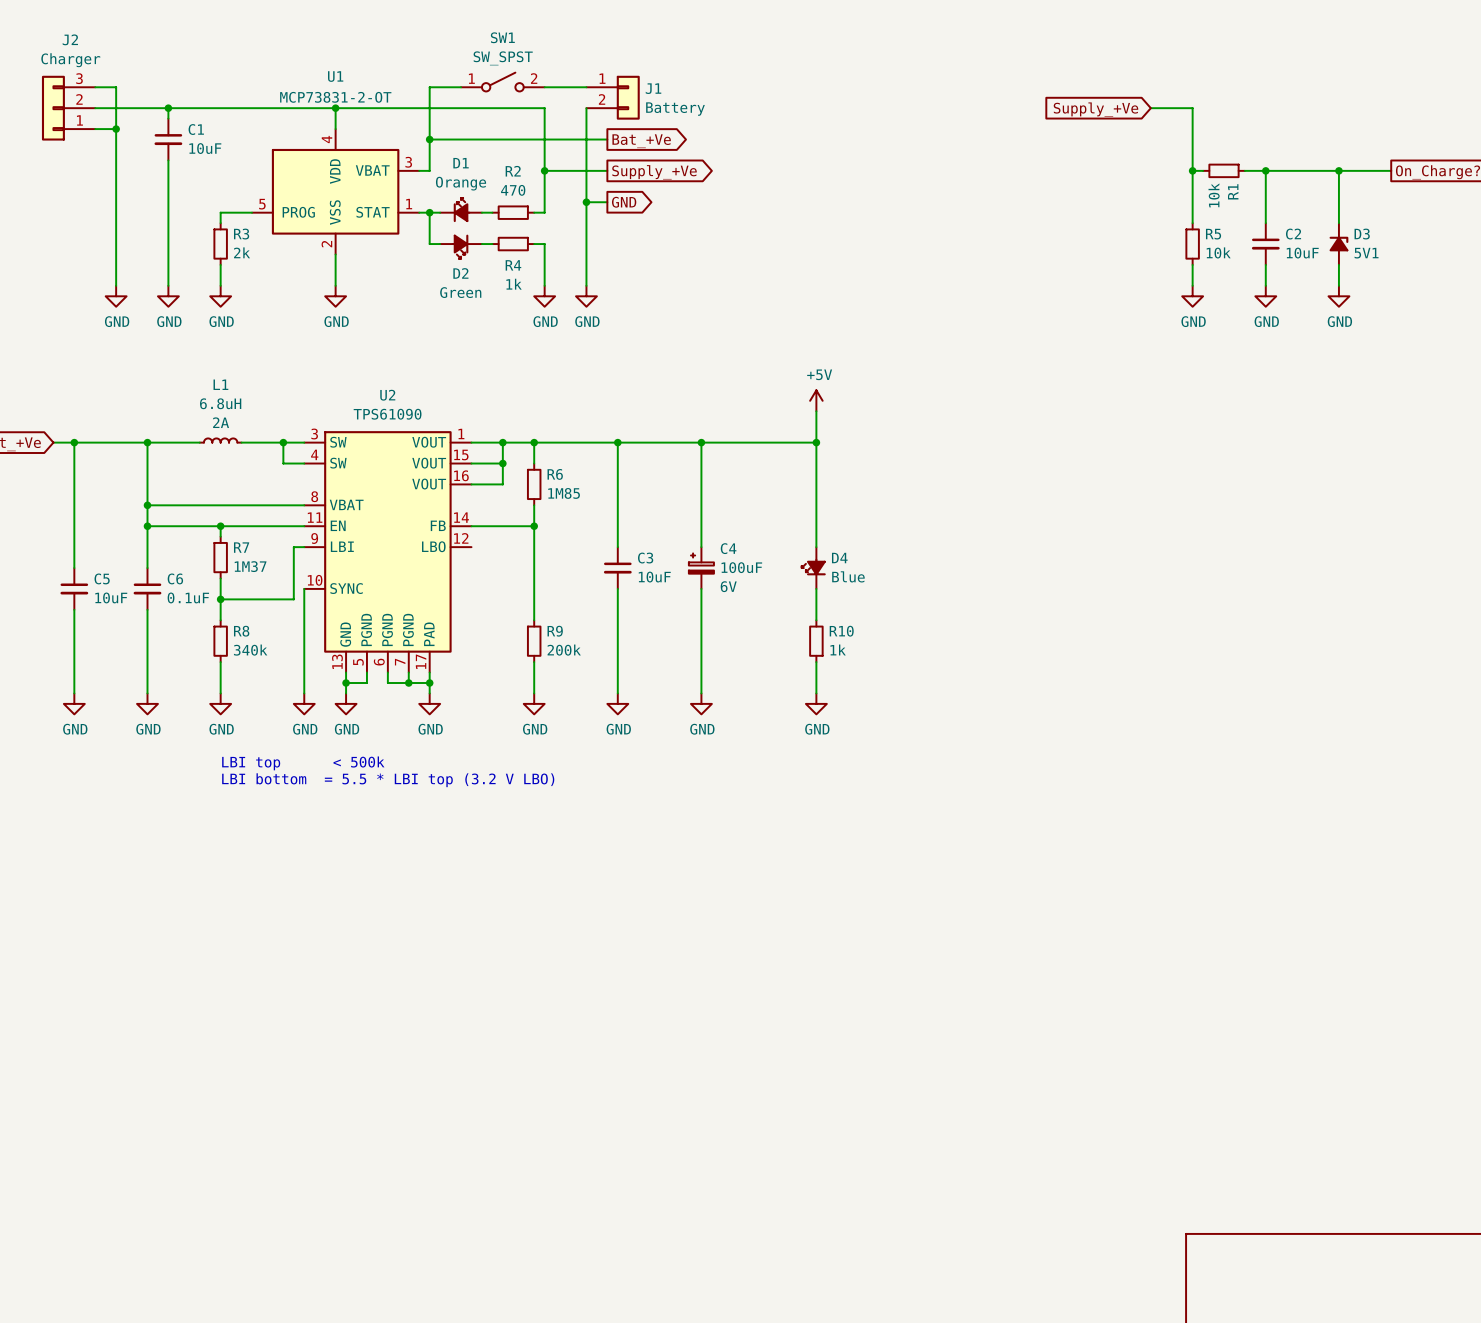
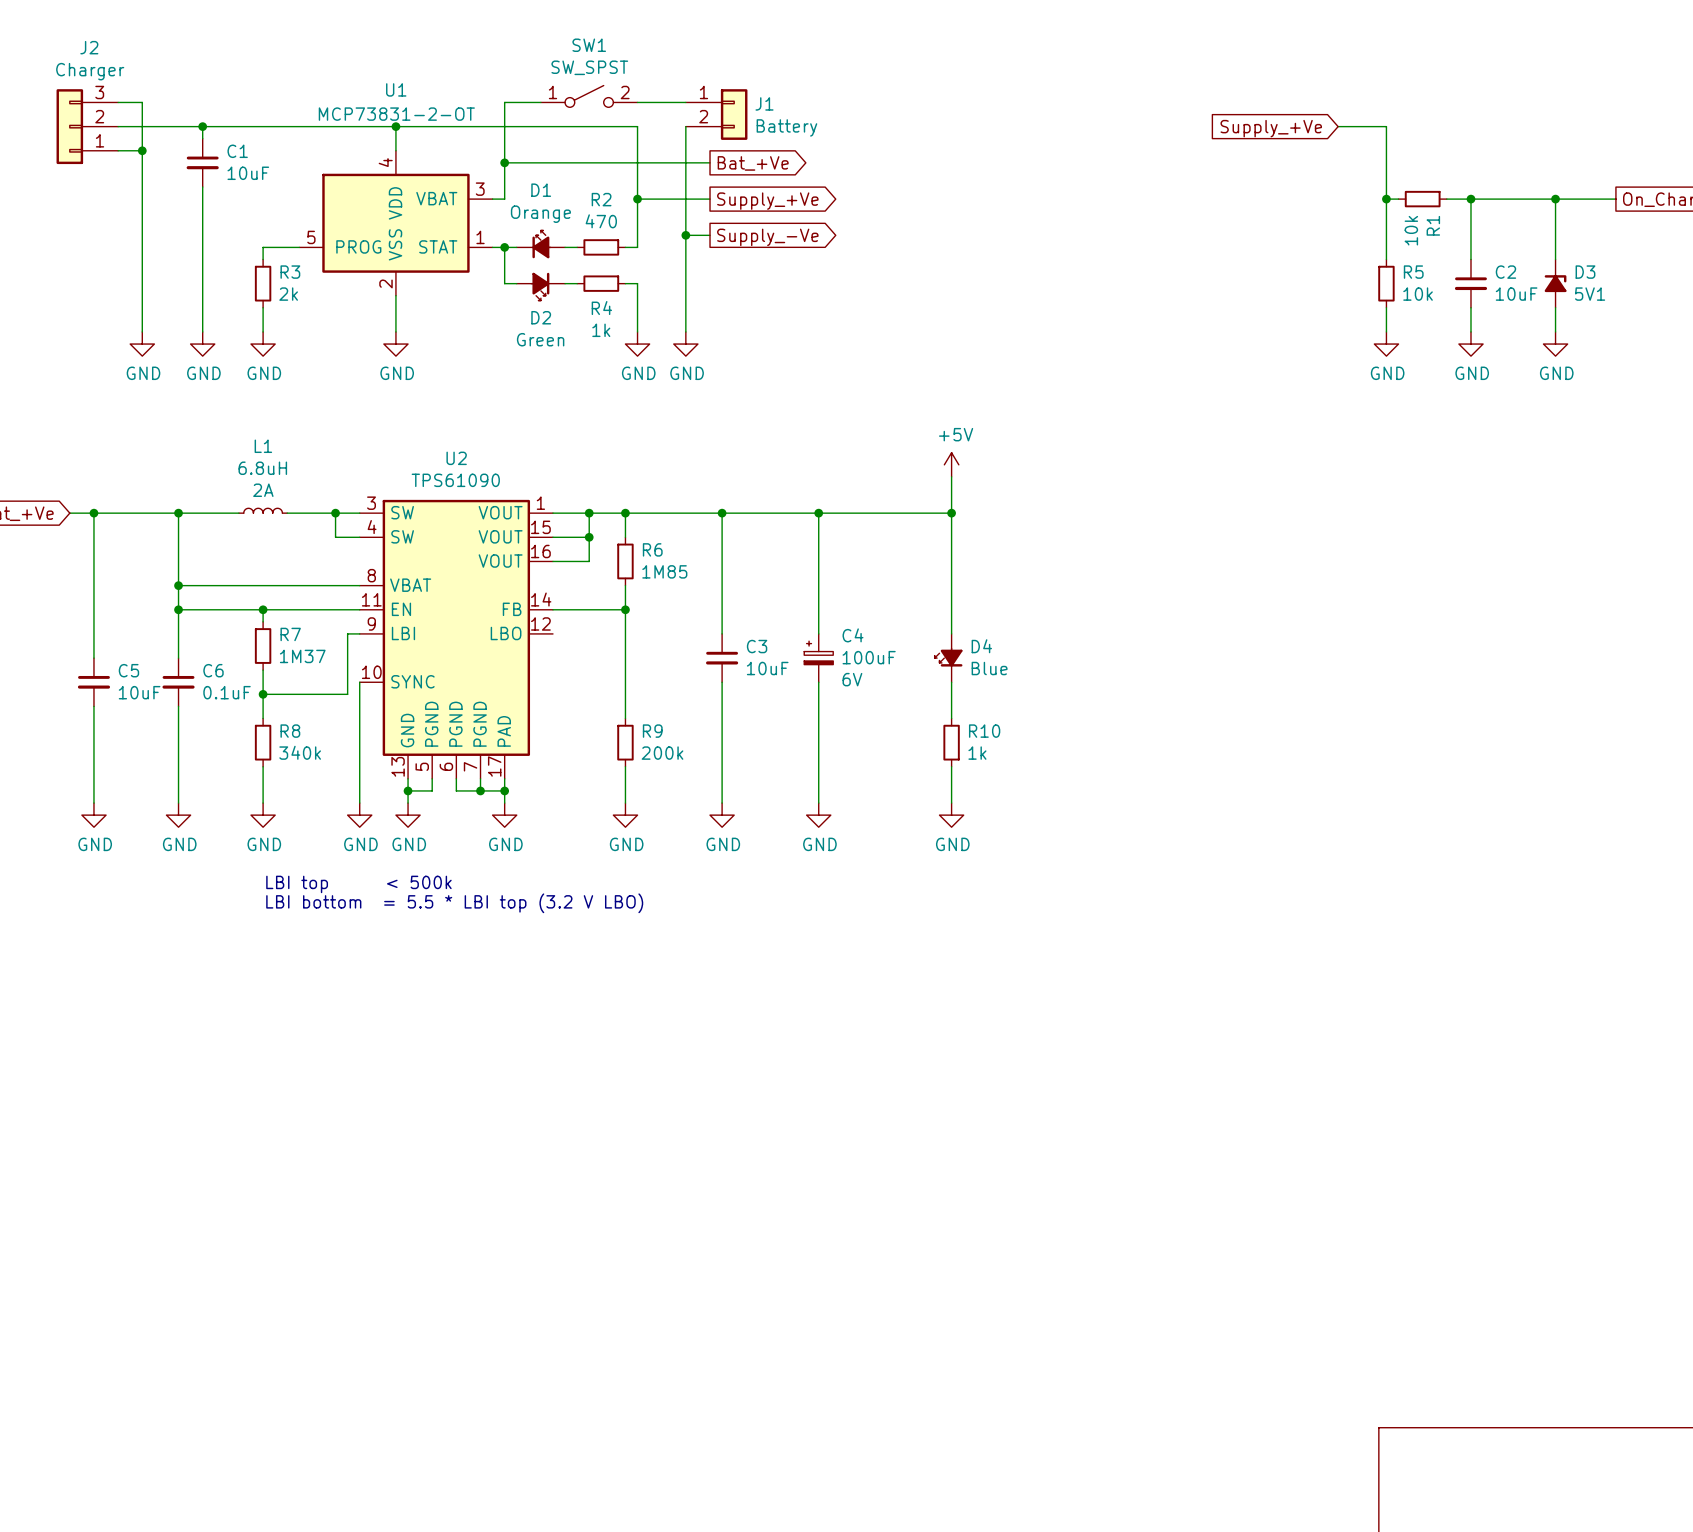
global label: GND (624, 202) -> Supply_-Ve (767, 237)

